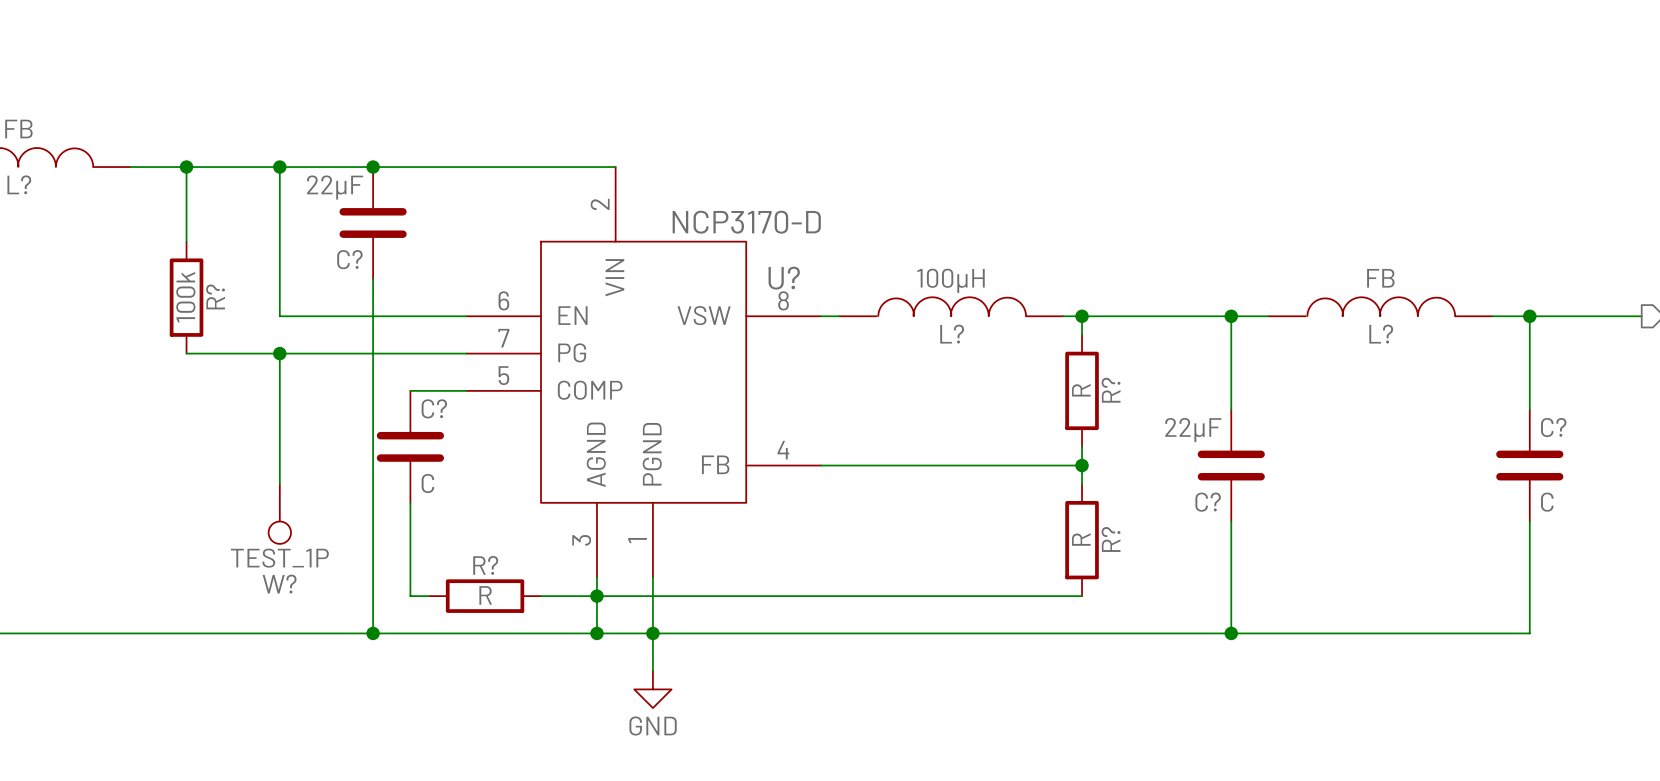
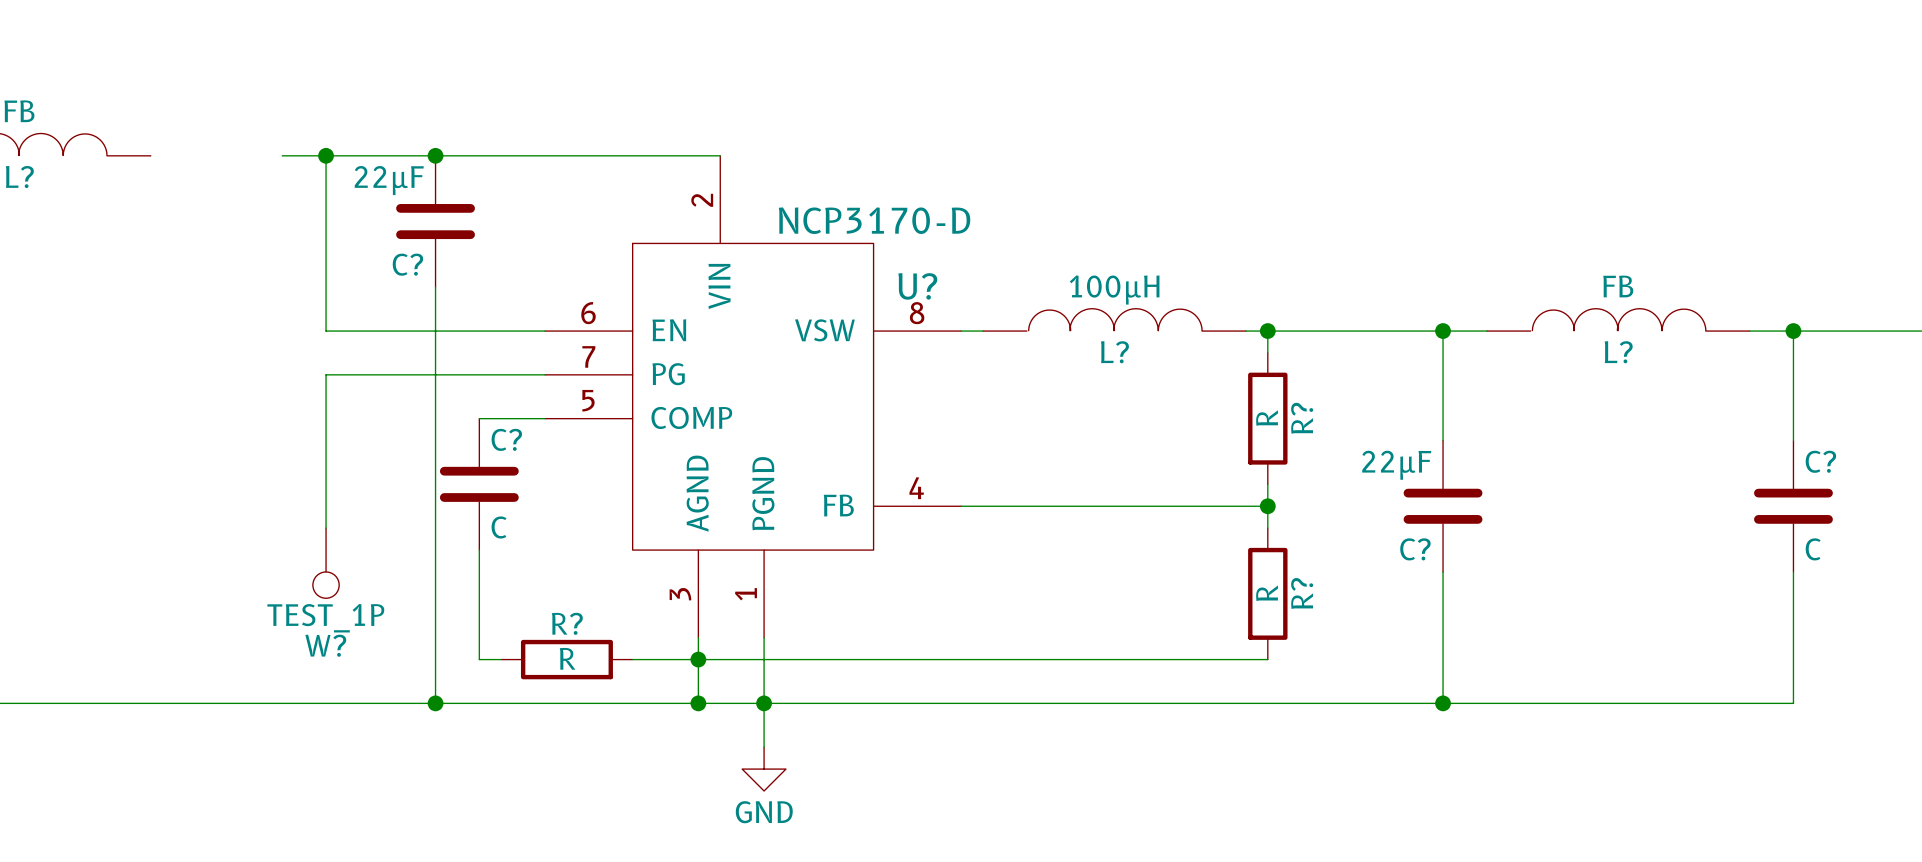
wire: (130, 167) (242, 167) -> none
wire: (186, 167) (186, 241) -> none
junction: (186, 167) -> none
R?: 100k (186, 297) -> none
wire: (186, 353) (279, 353) -> none
junction: (279, 353) -> none

